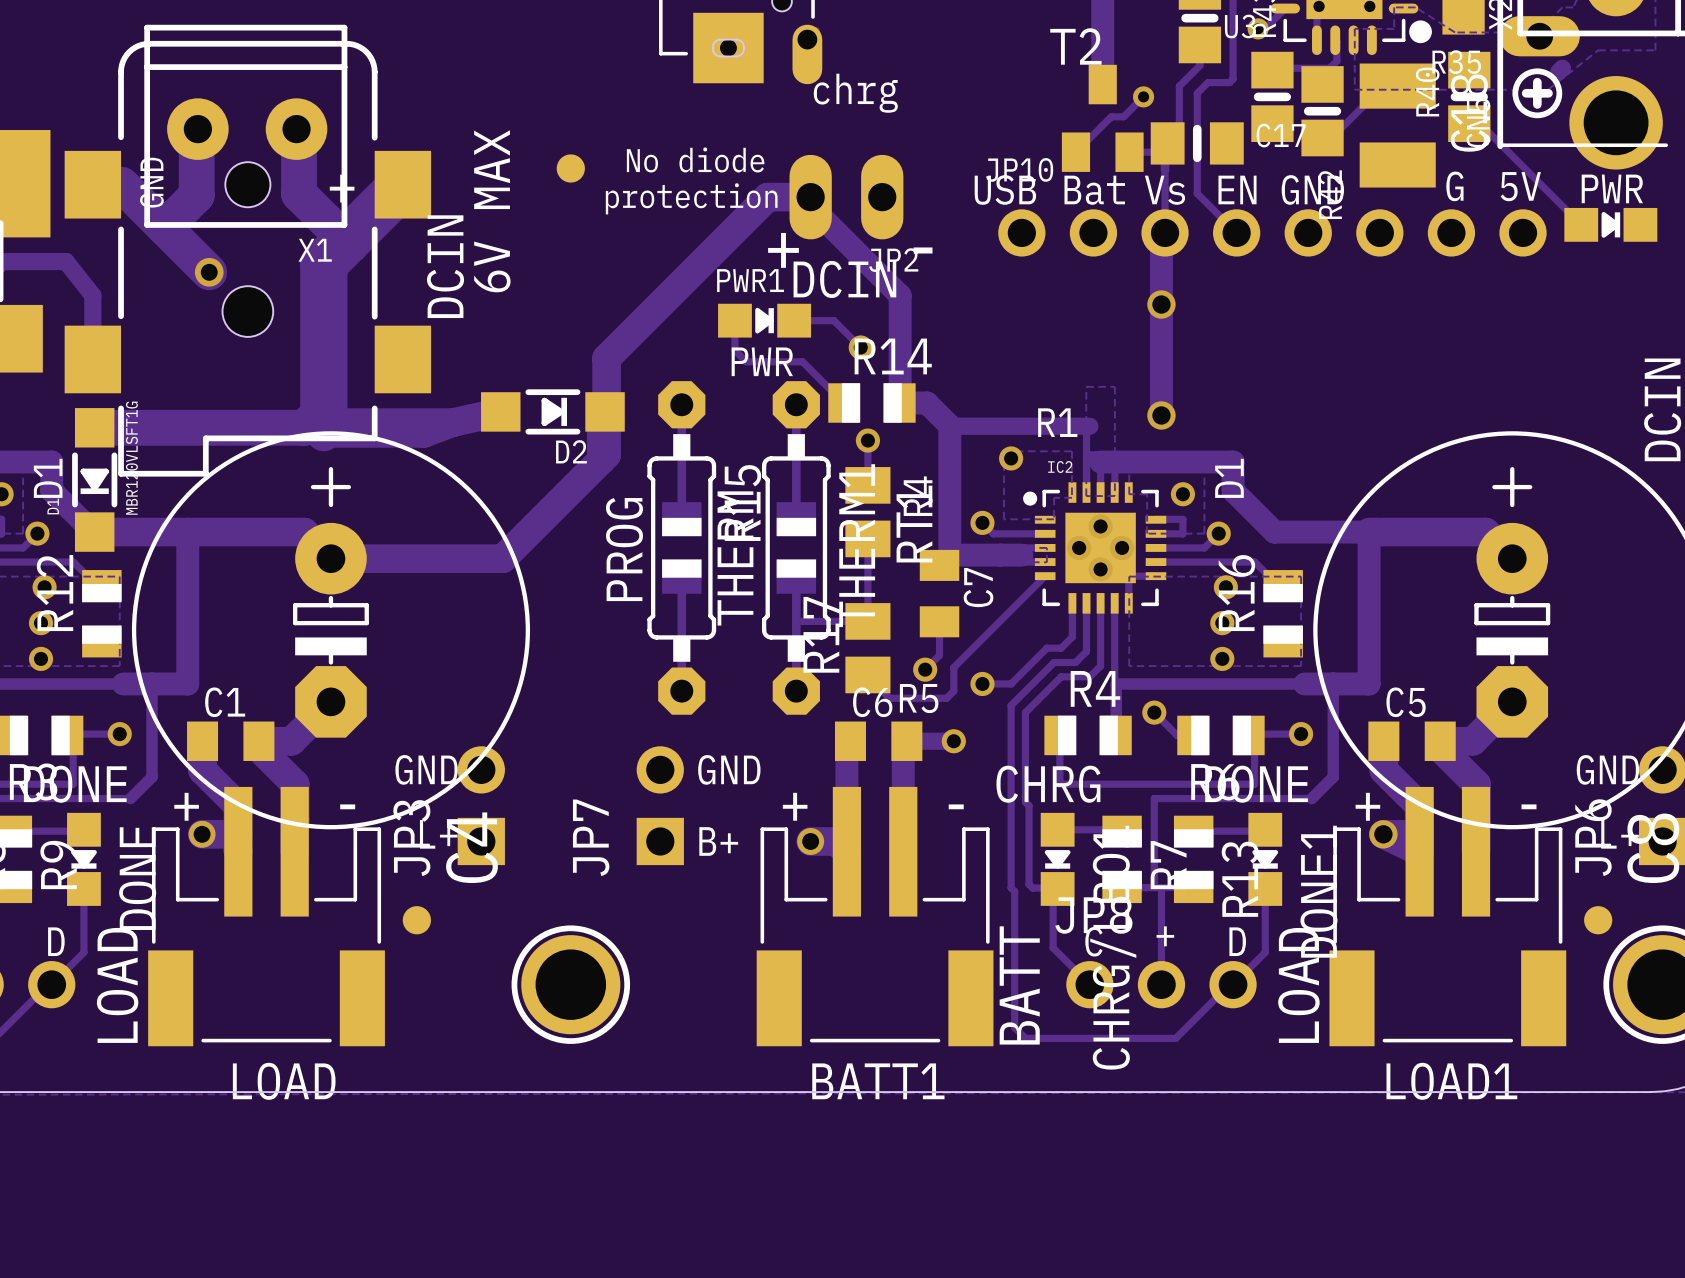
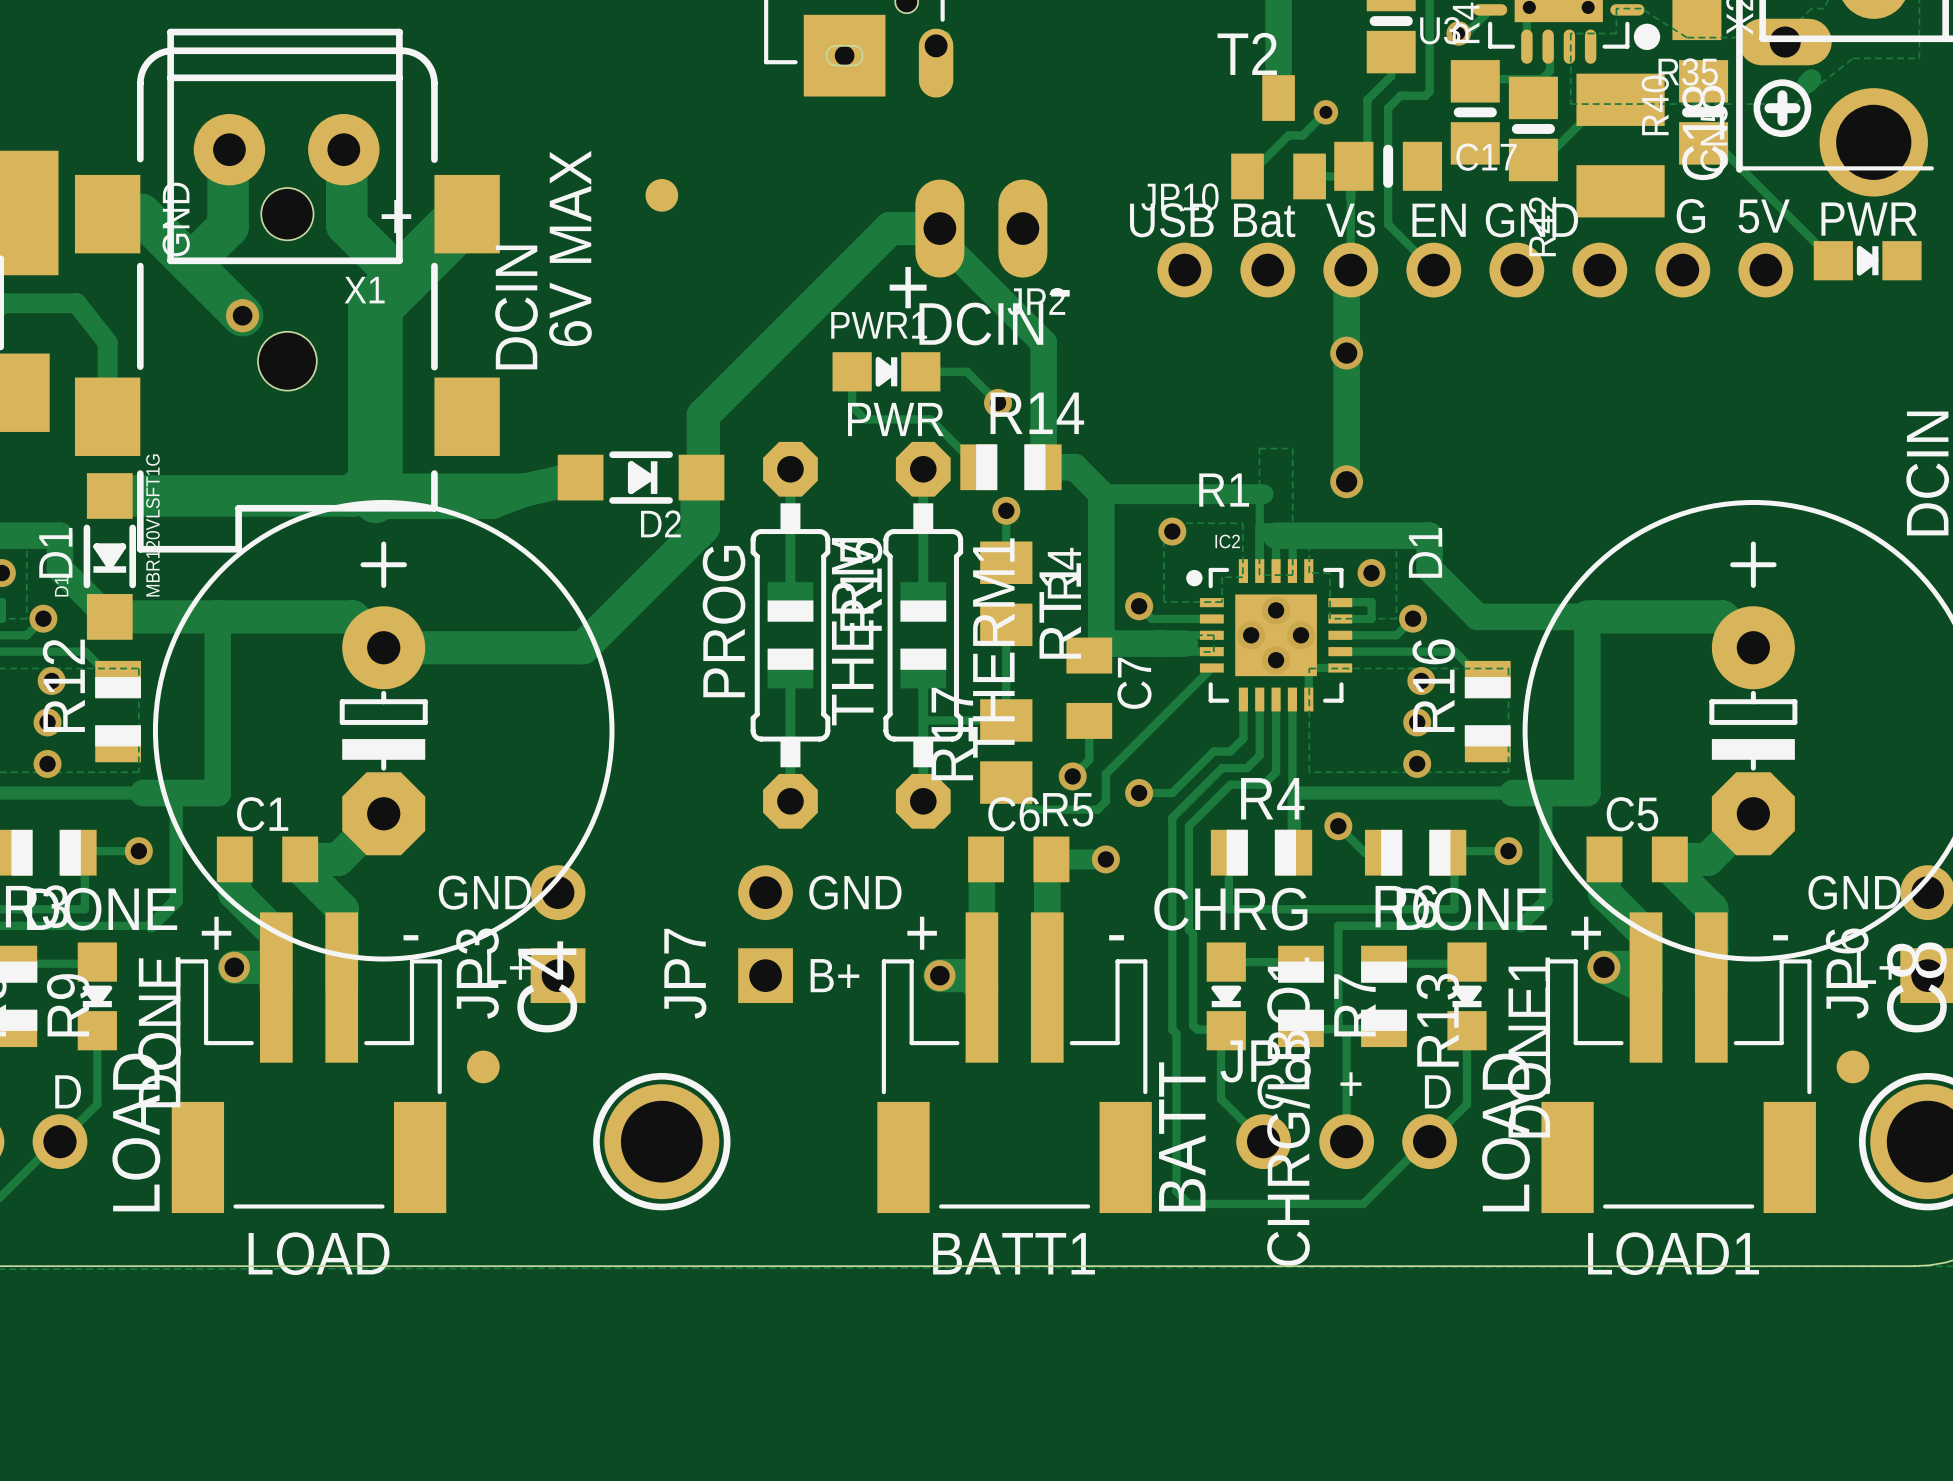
text: chrg (855, 93) -> none
text: No diode (695, 159) -> none
text: protection (691, 198) -> none

